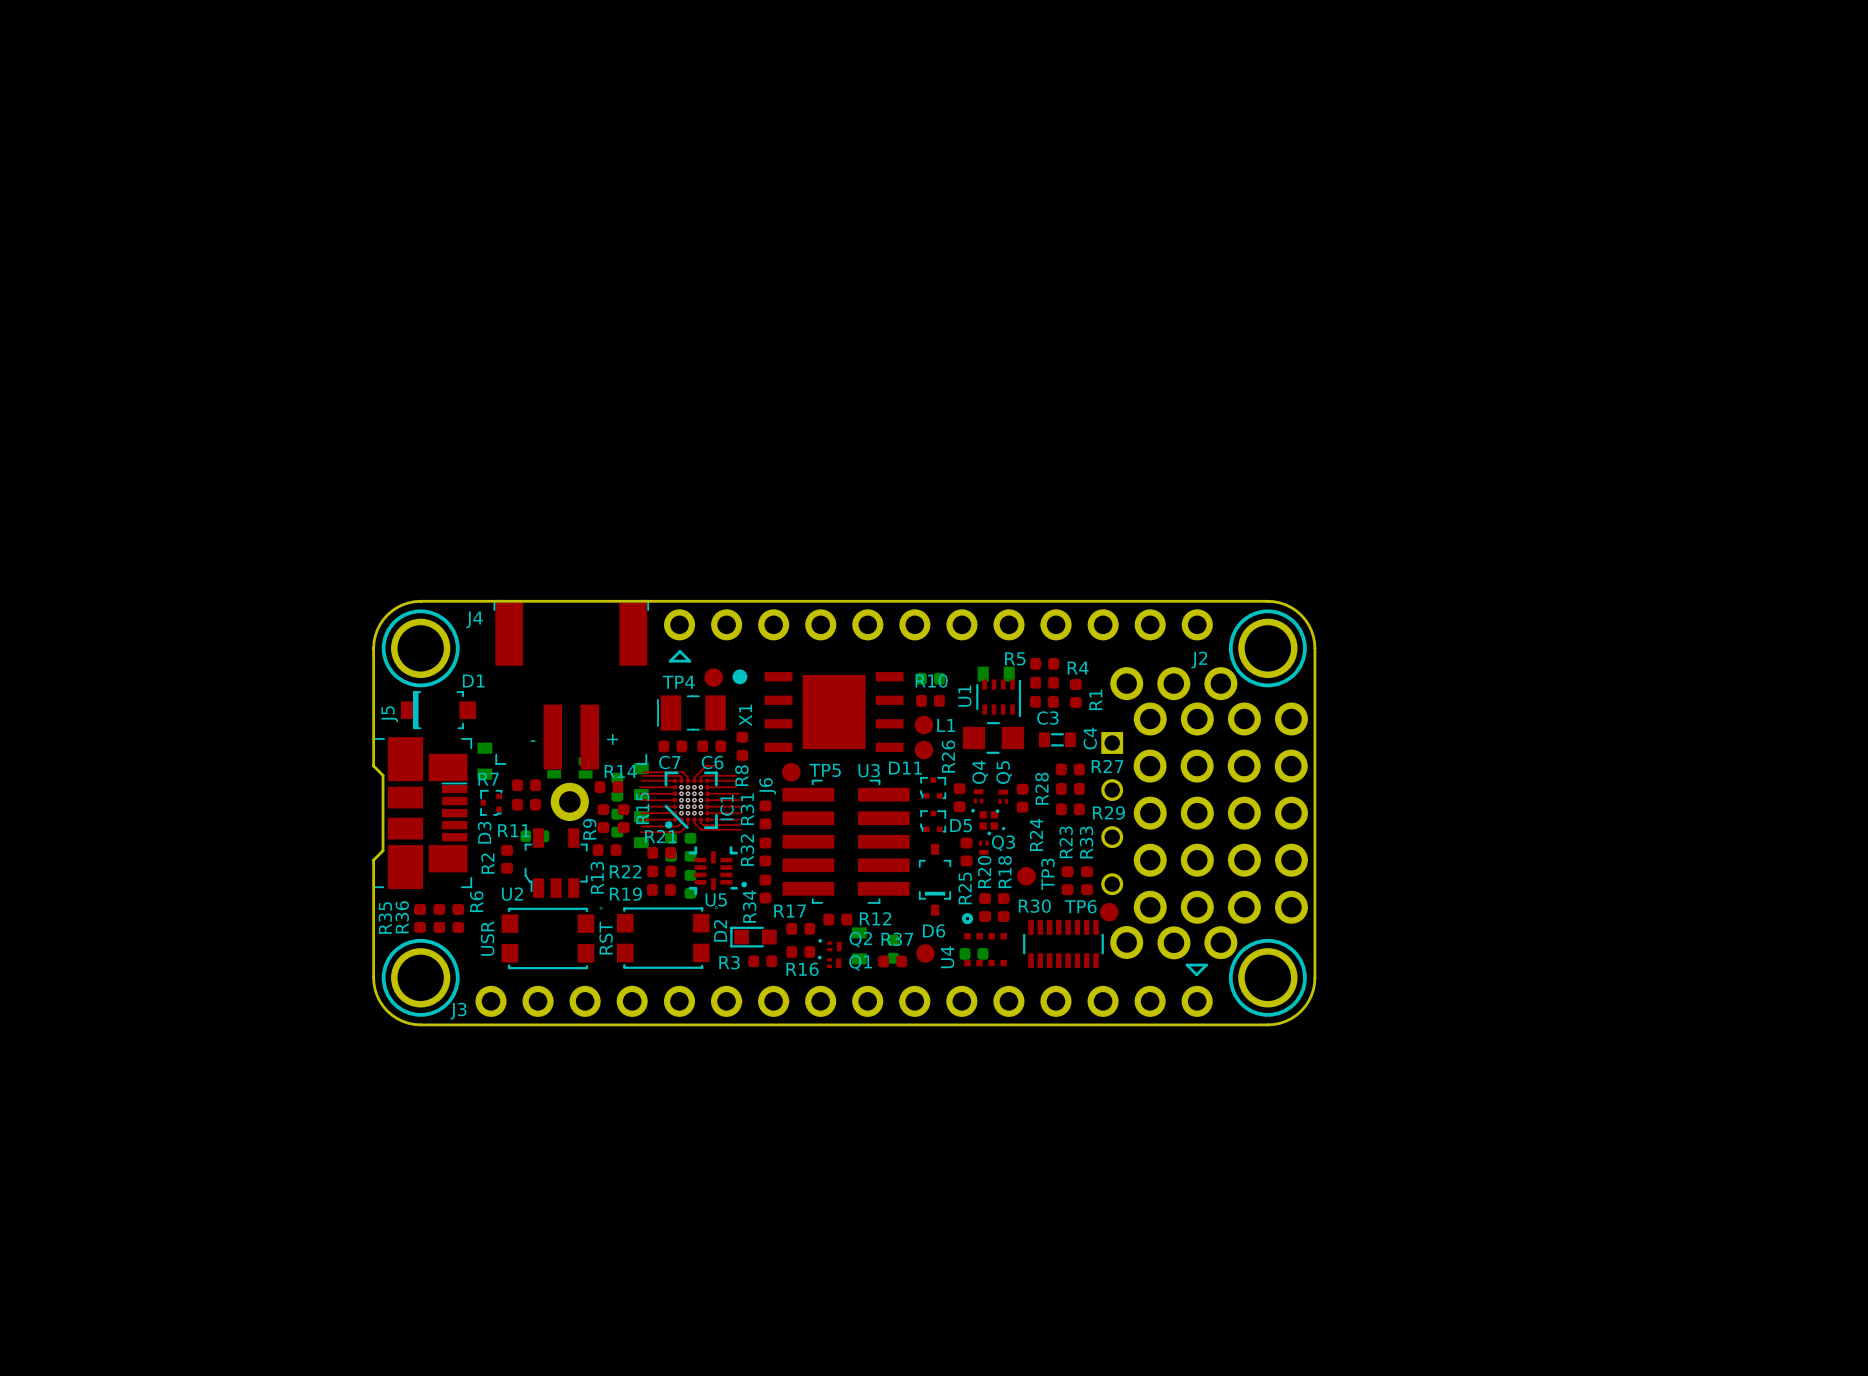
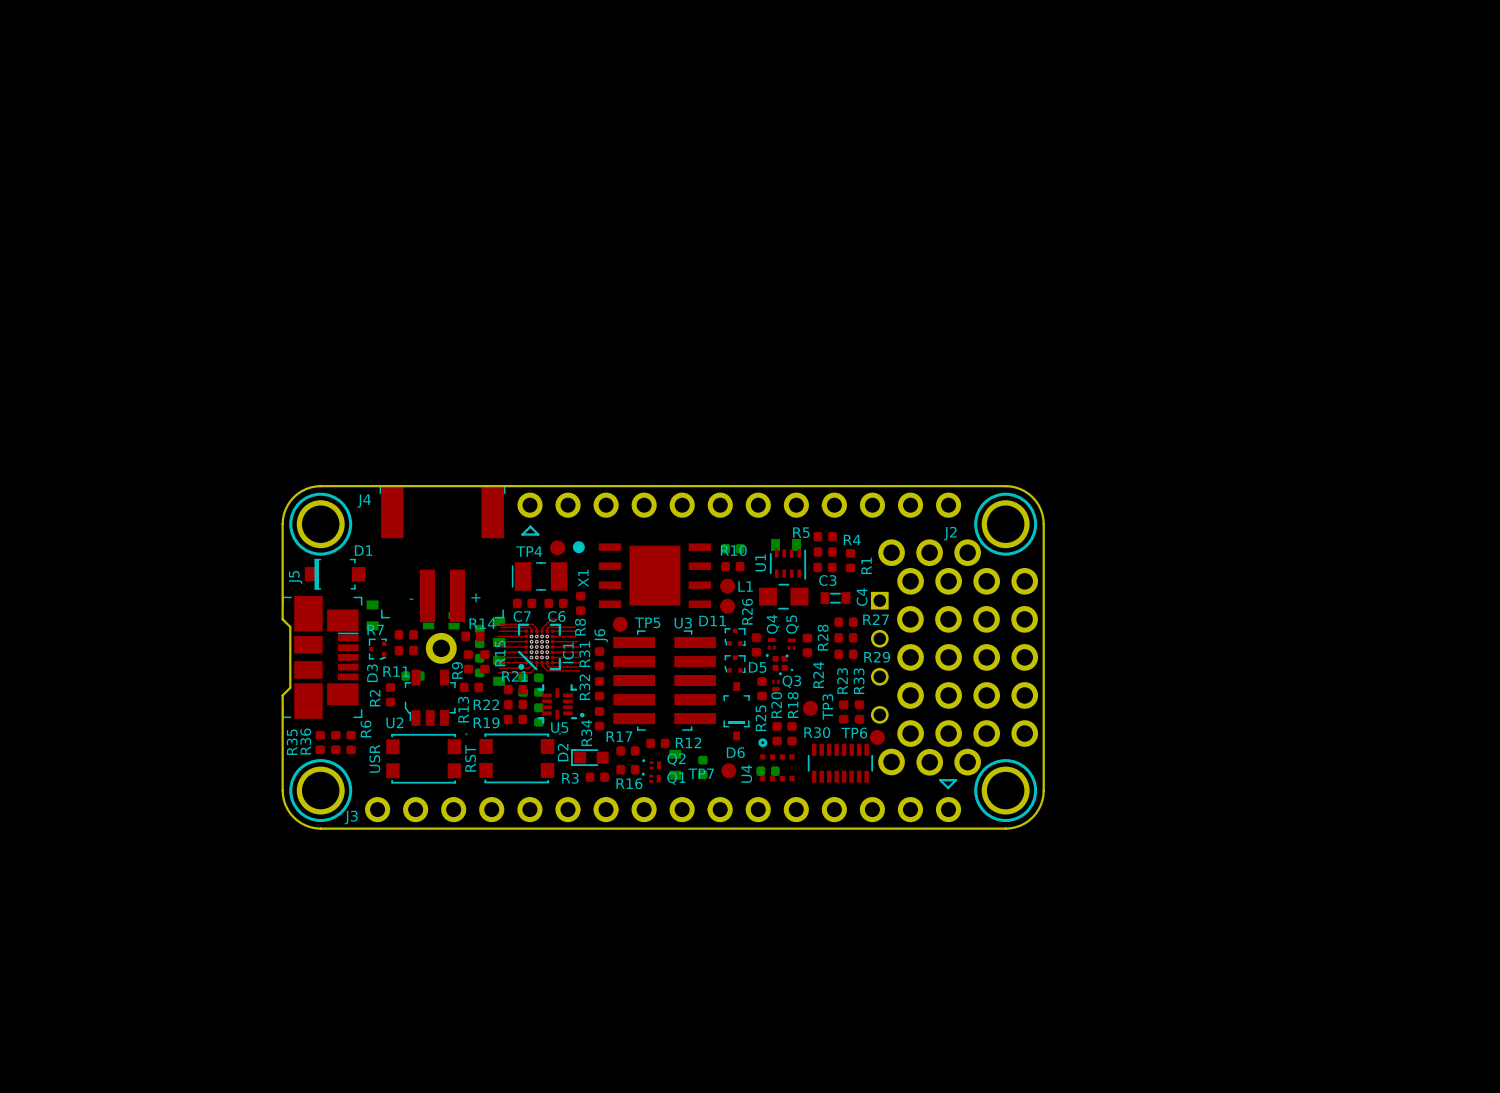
TP7 name: none -> TP7 (701, 773)
R37: (892, 961) -> none

